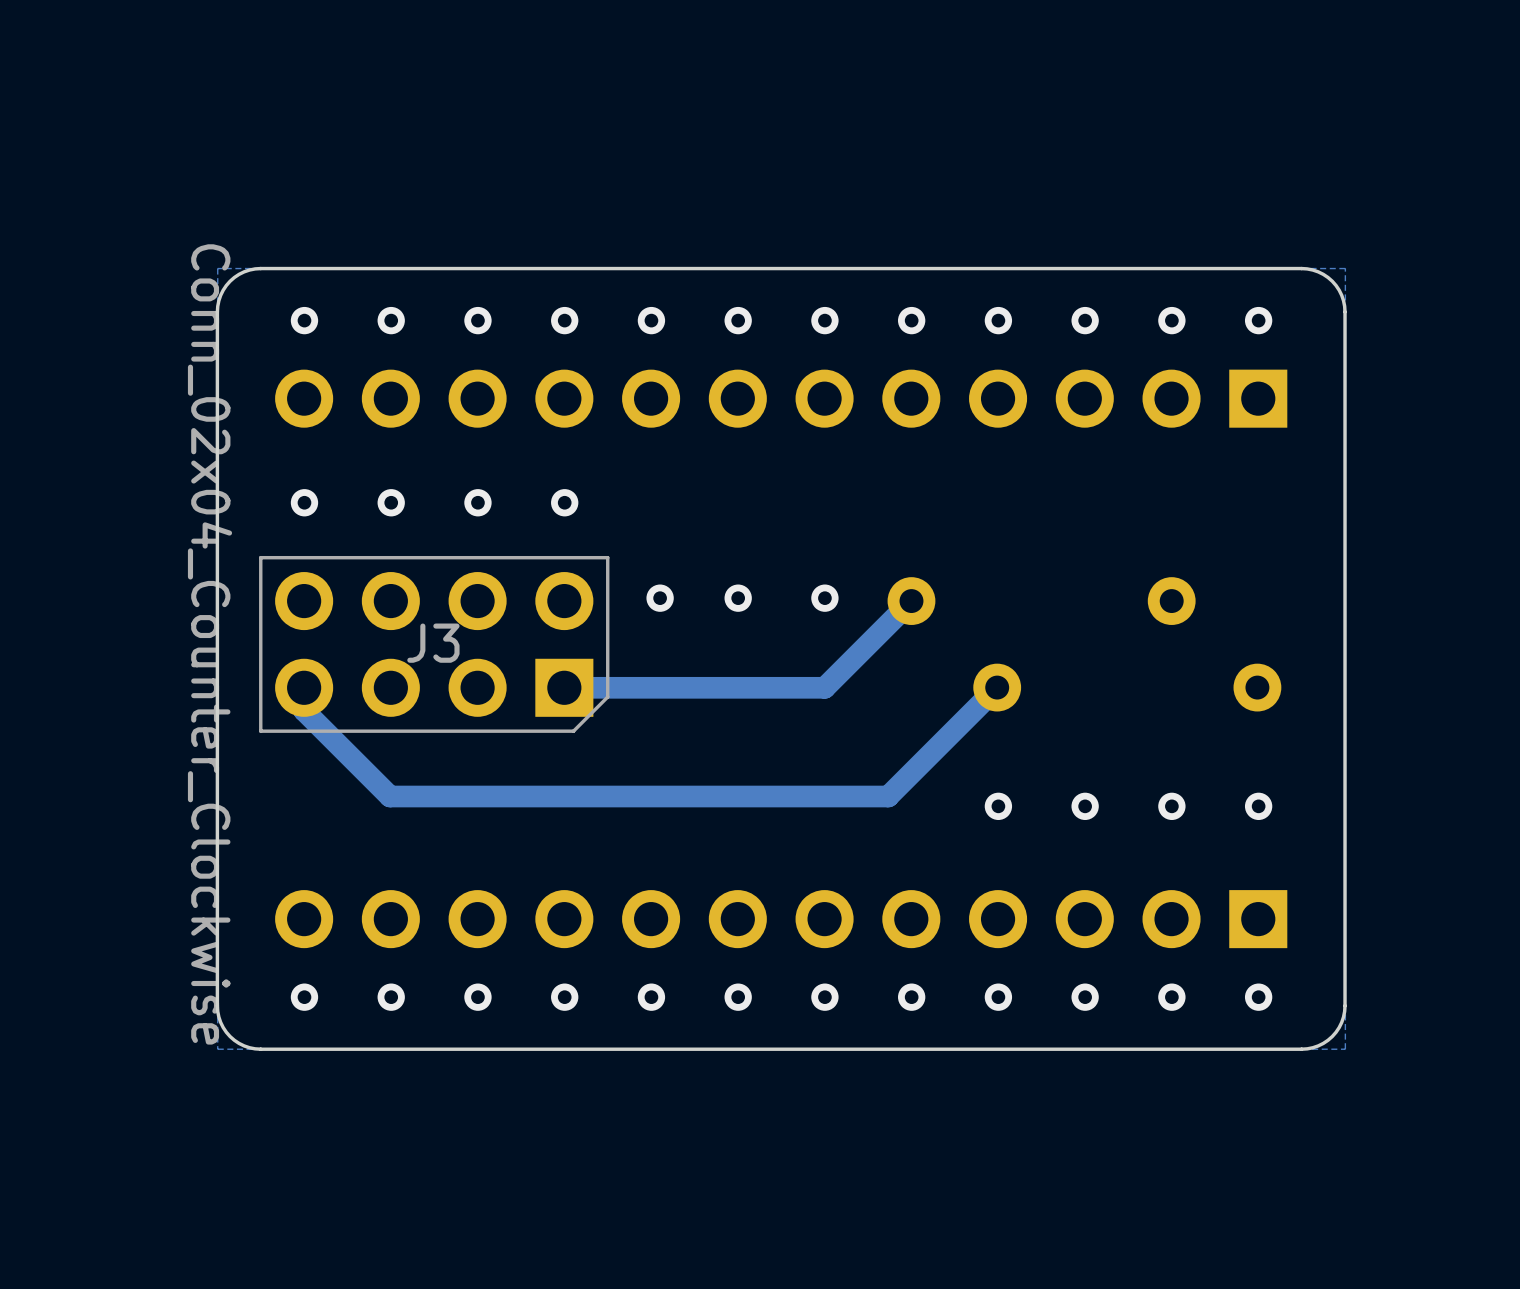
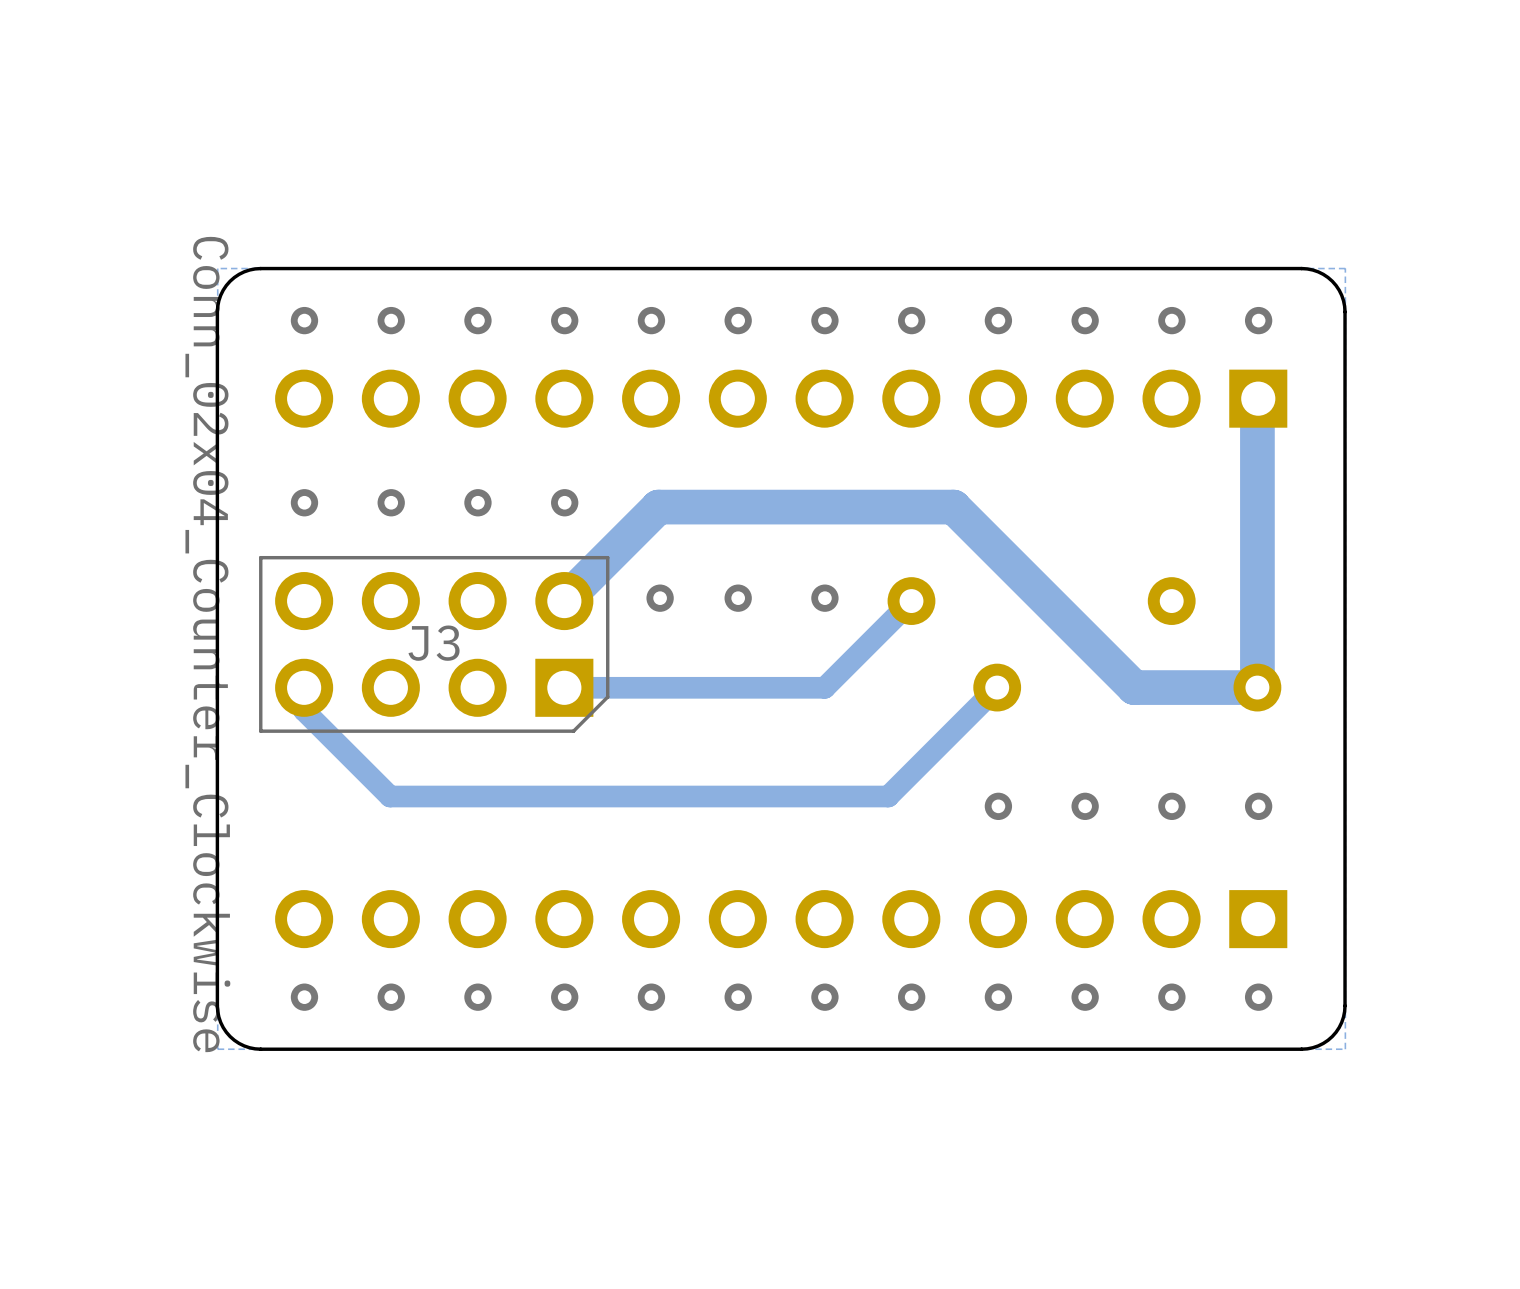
track: none -> (1257, 399) (1257, 687) (1134, 687) (953, 507) (658, 507) (564, 601)

